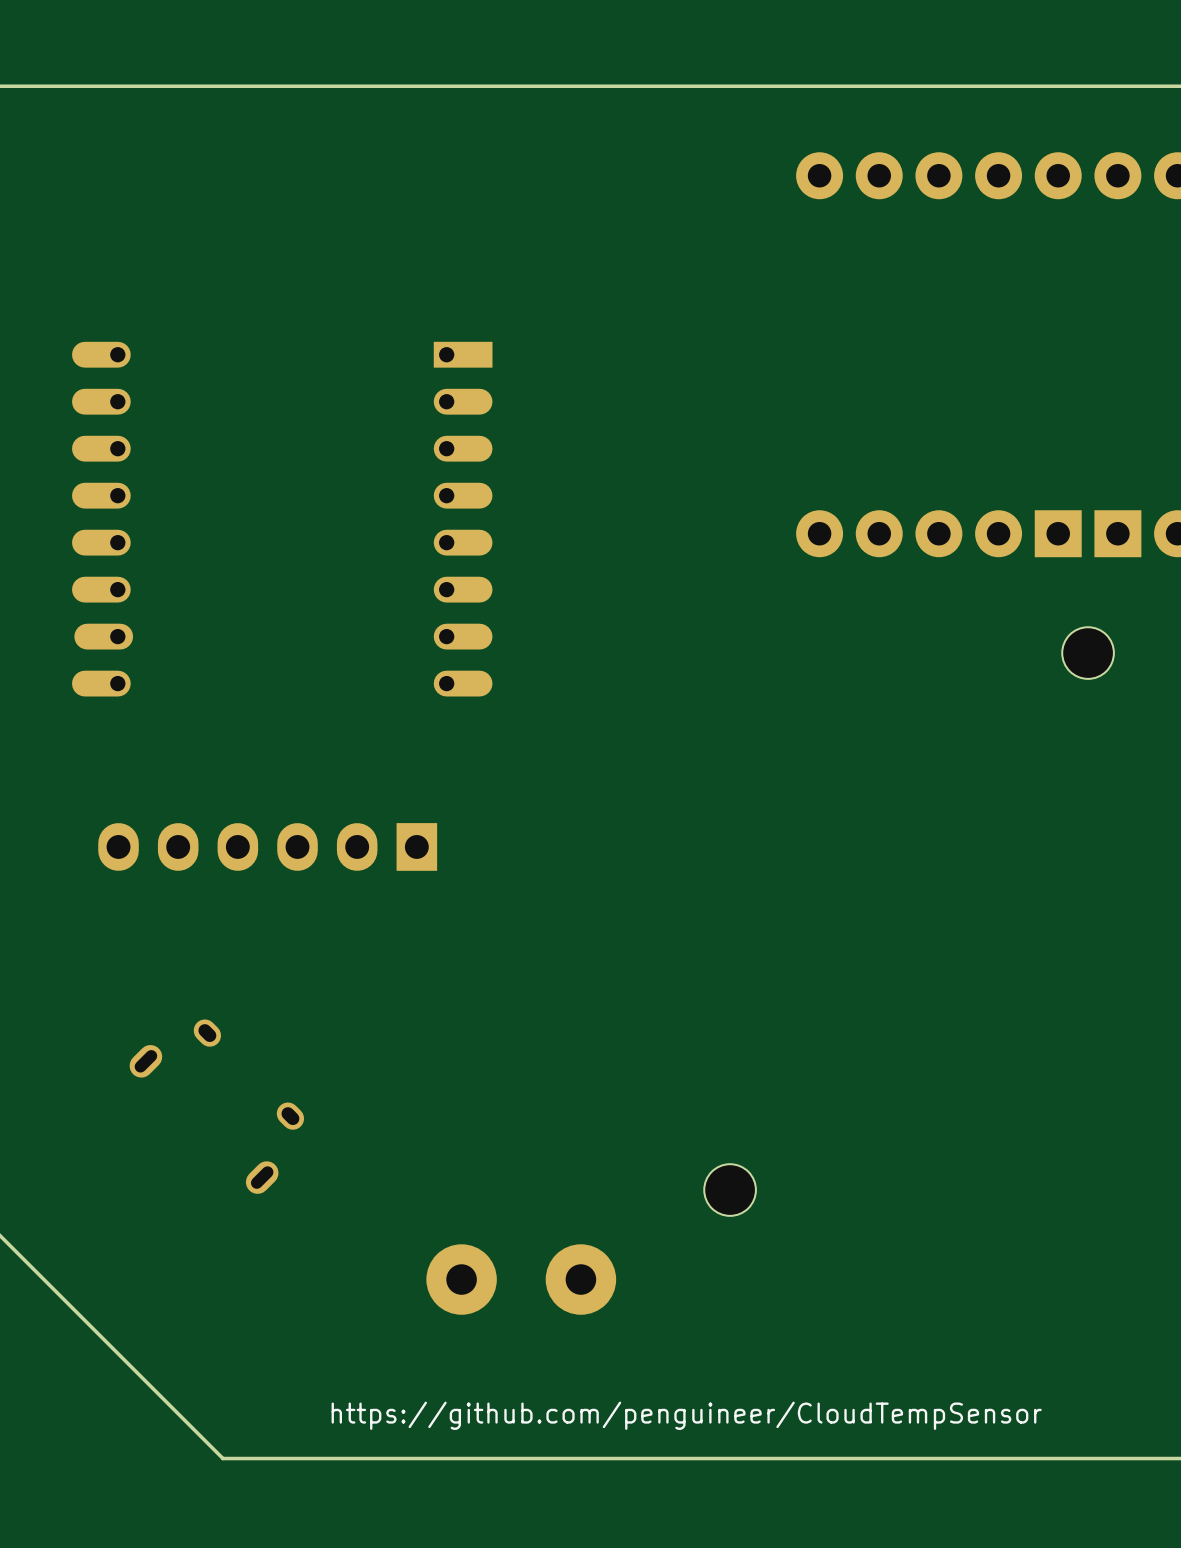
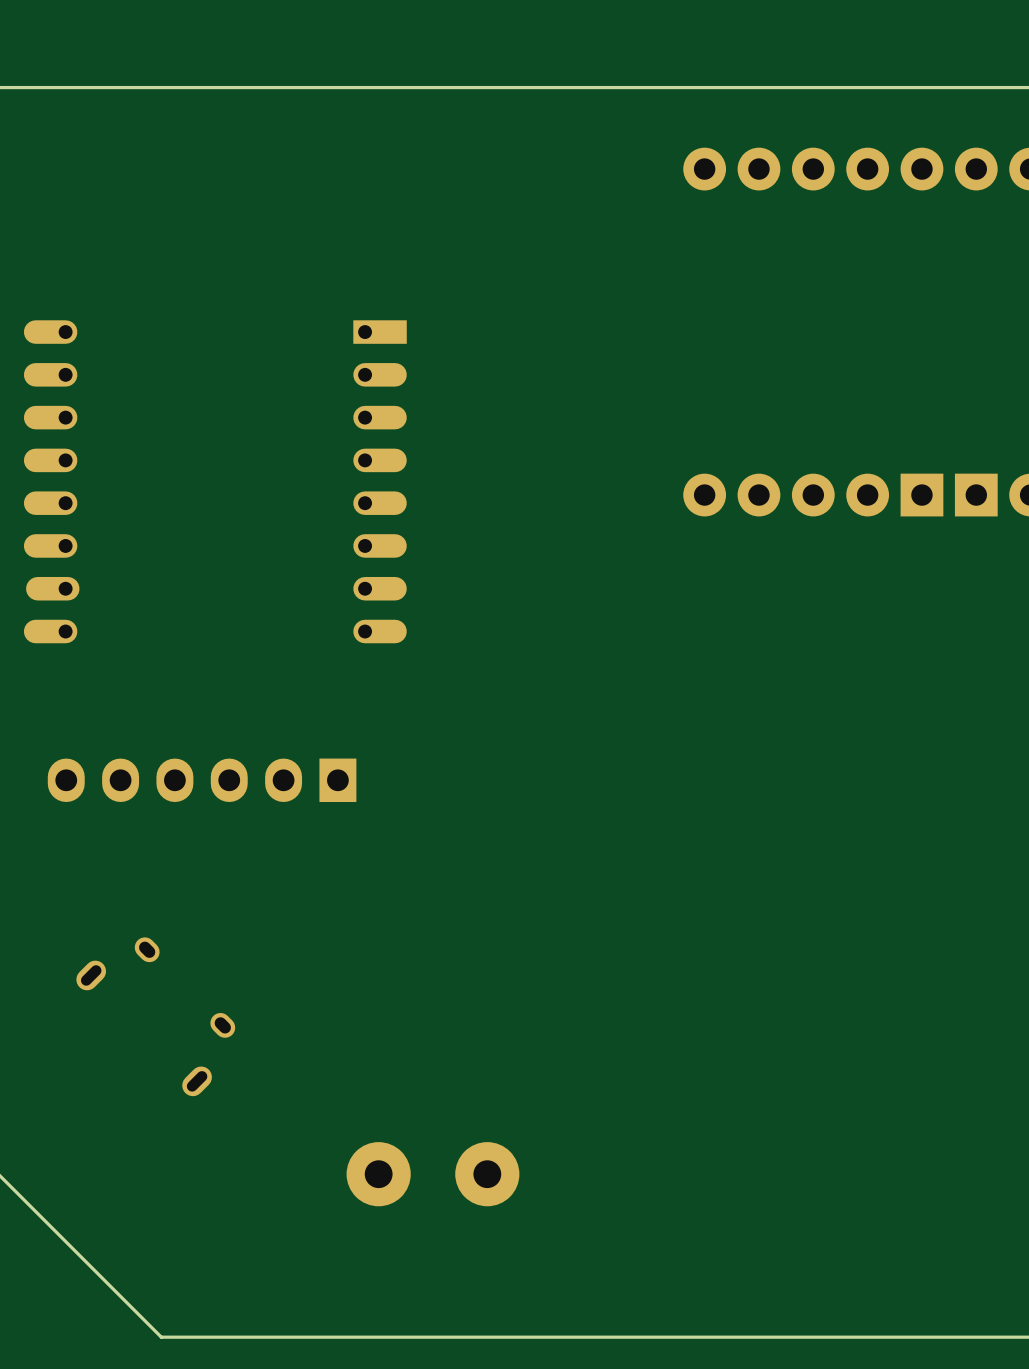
part: (1088, 653) -> none
part: (730, 1190) -> none
text: https://github.com/penguineer/CloudTempSensor (686, 1415) -> none

